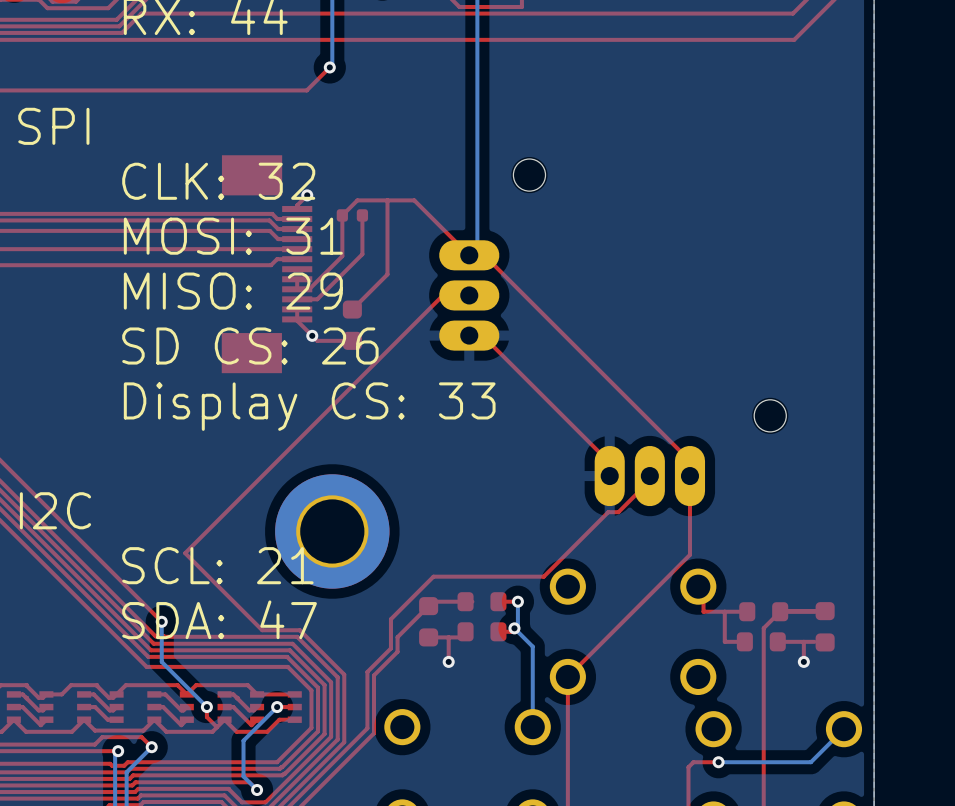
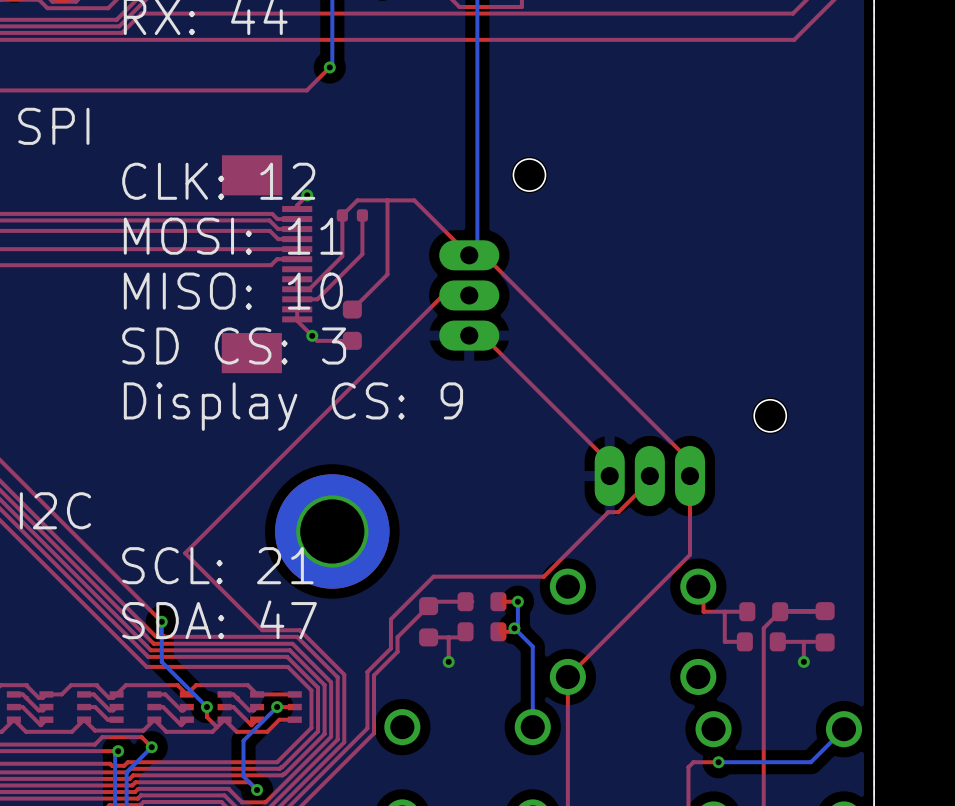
text: CLK: 32 (218, 181) -> CLK: 12 (218, 181)
text: MOSI: 31 (233, 236) -> MOSI: 11 (233, 236)
text: MISO: 29 (233, 291) -> MISO: 10 (233, 291)
text: SD CS: 26 (250, 346) -> SD CS: 3 (234, 346)
text: Display CS: 33 (309, 406) -> Display CS: 9 (293, 406)

